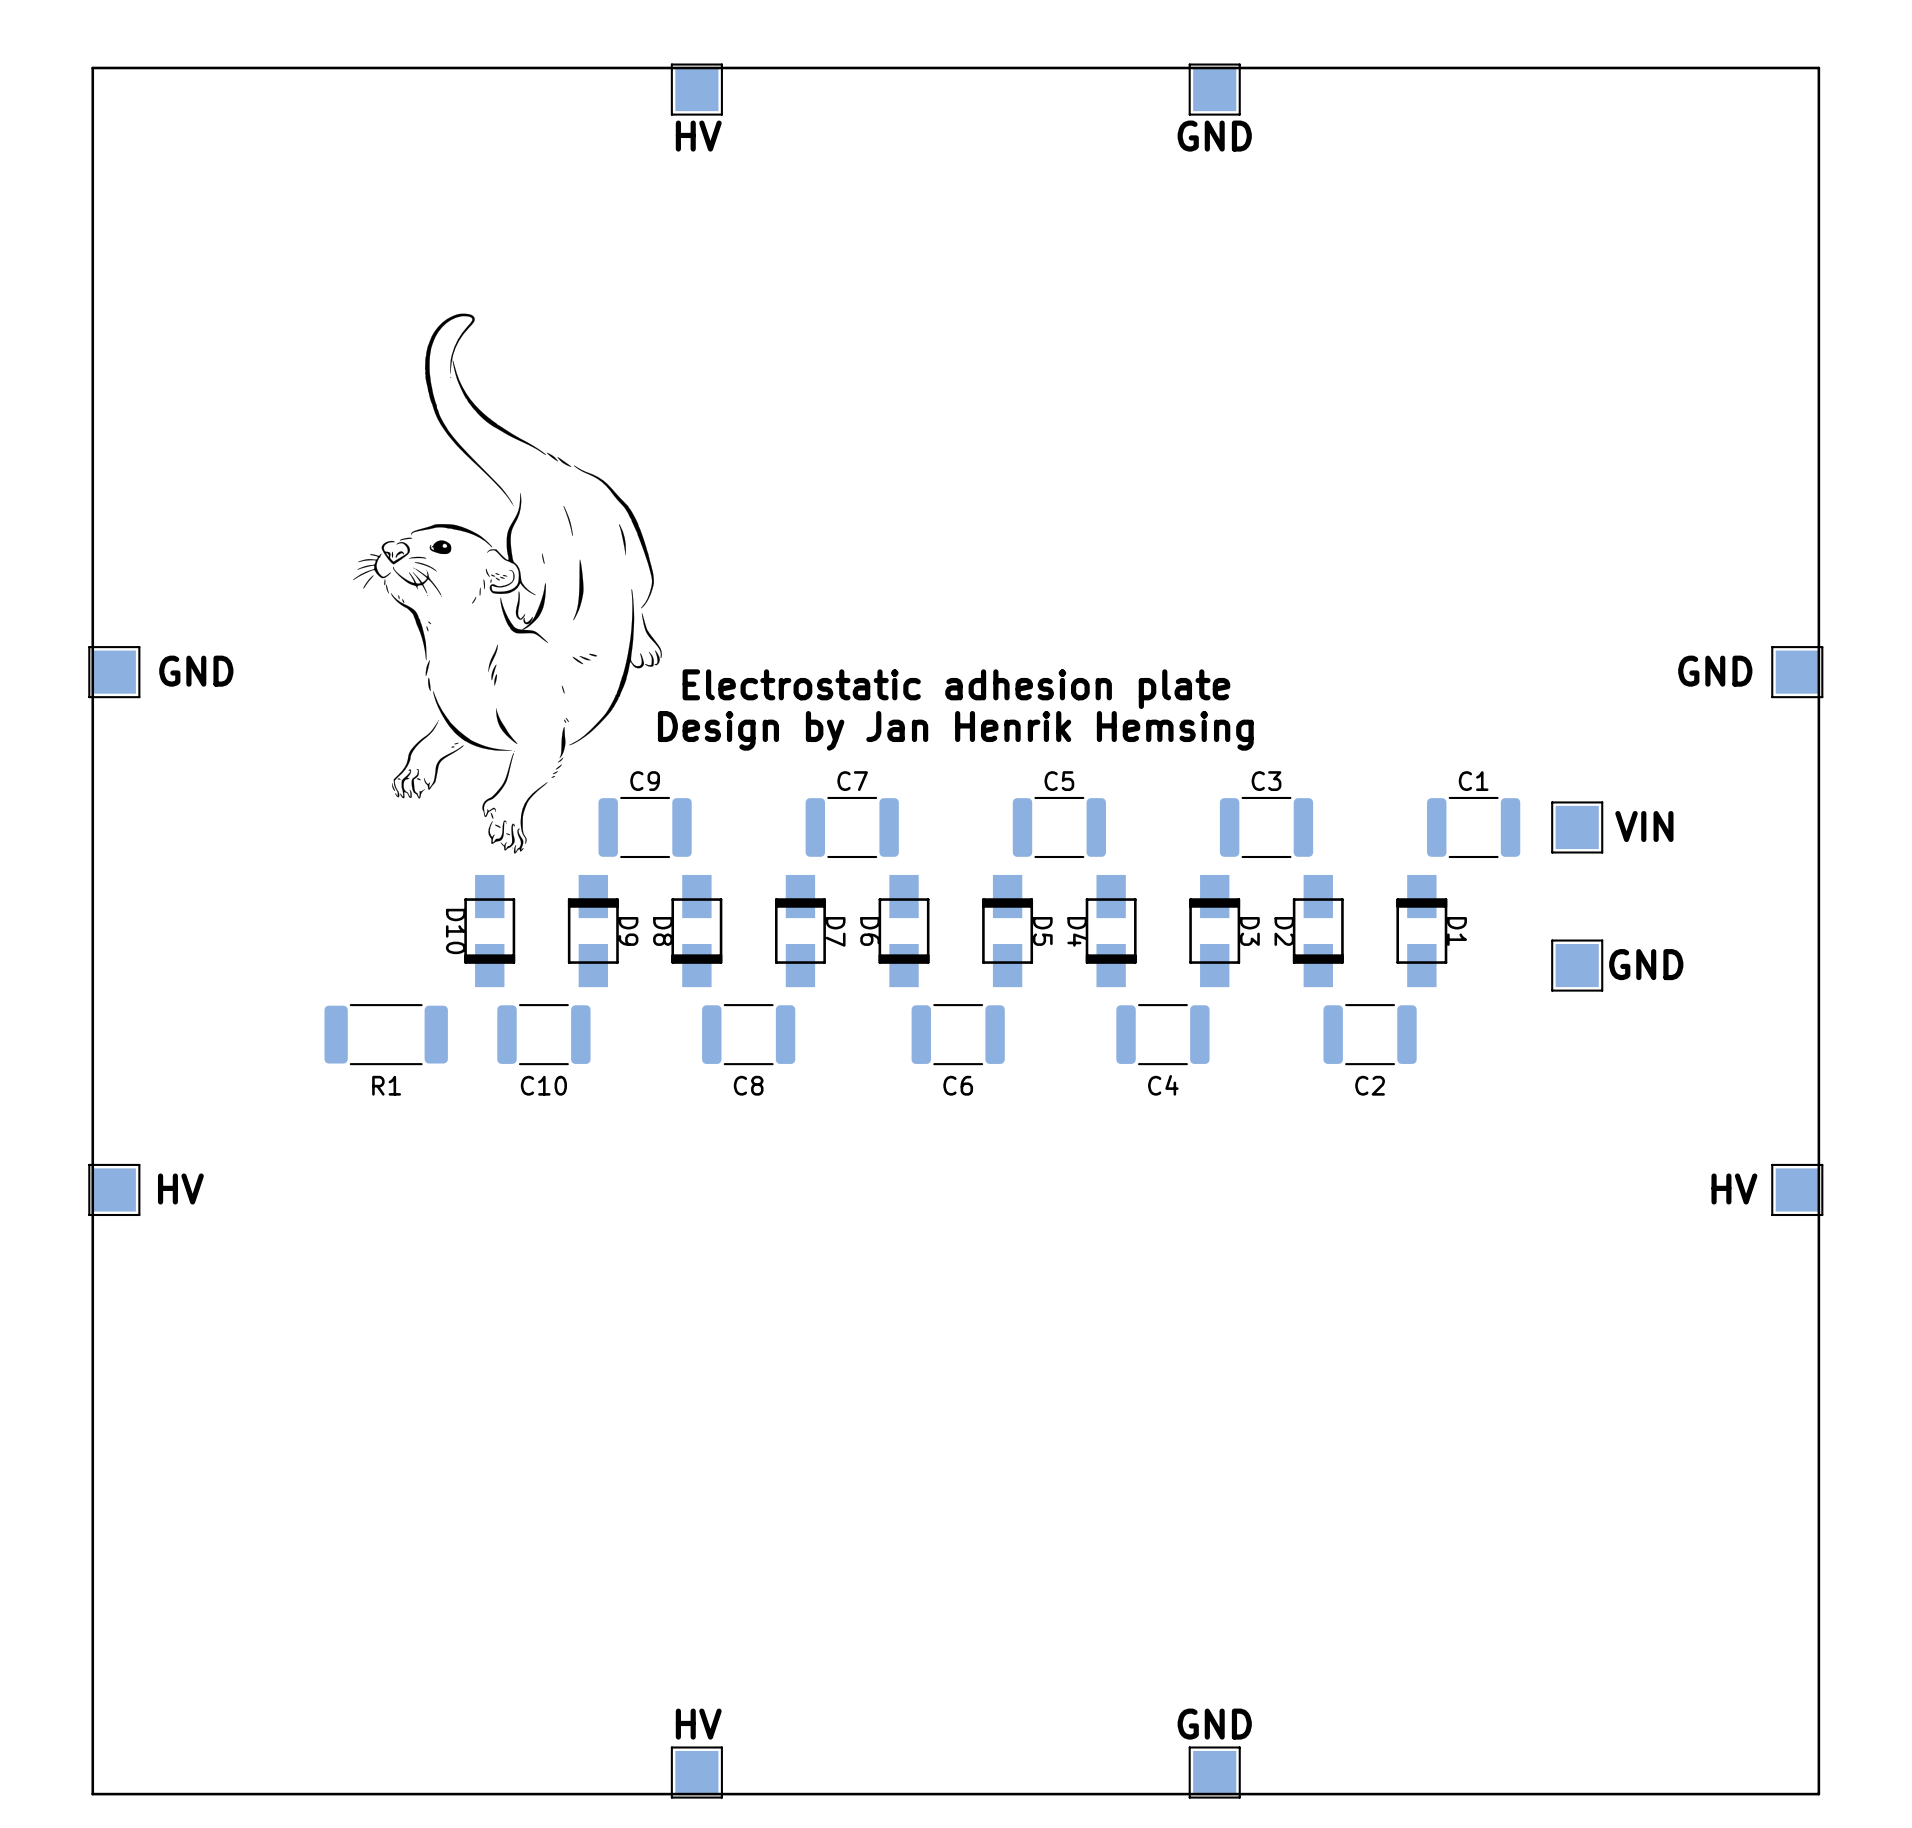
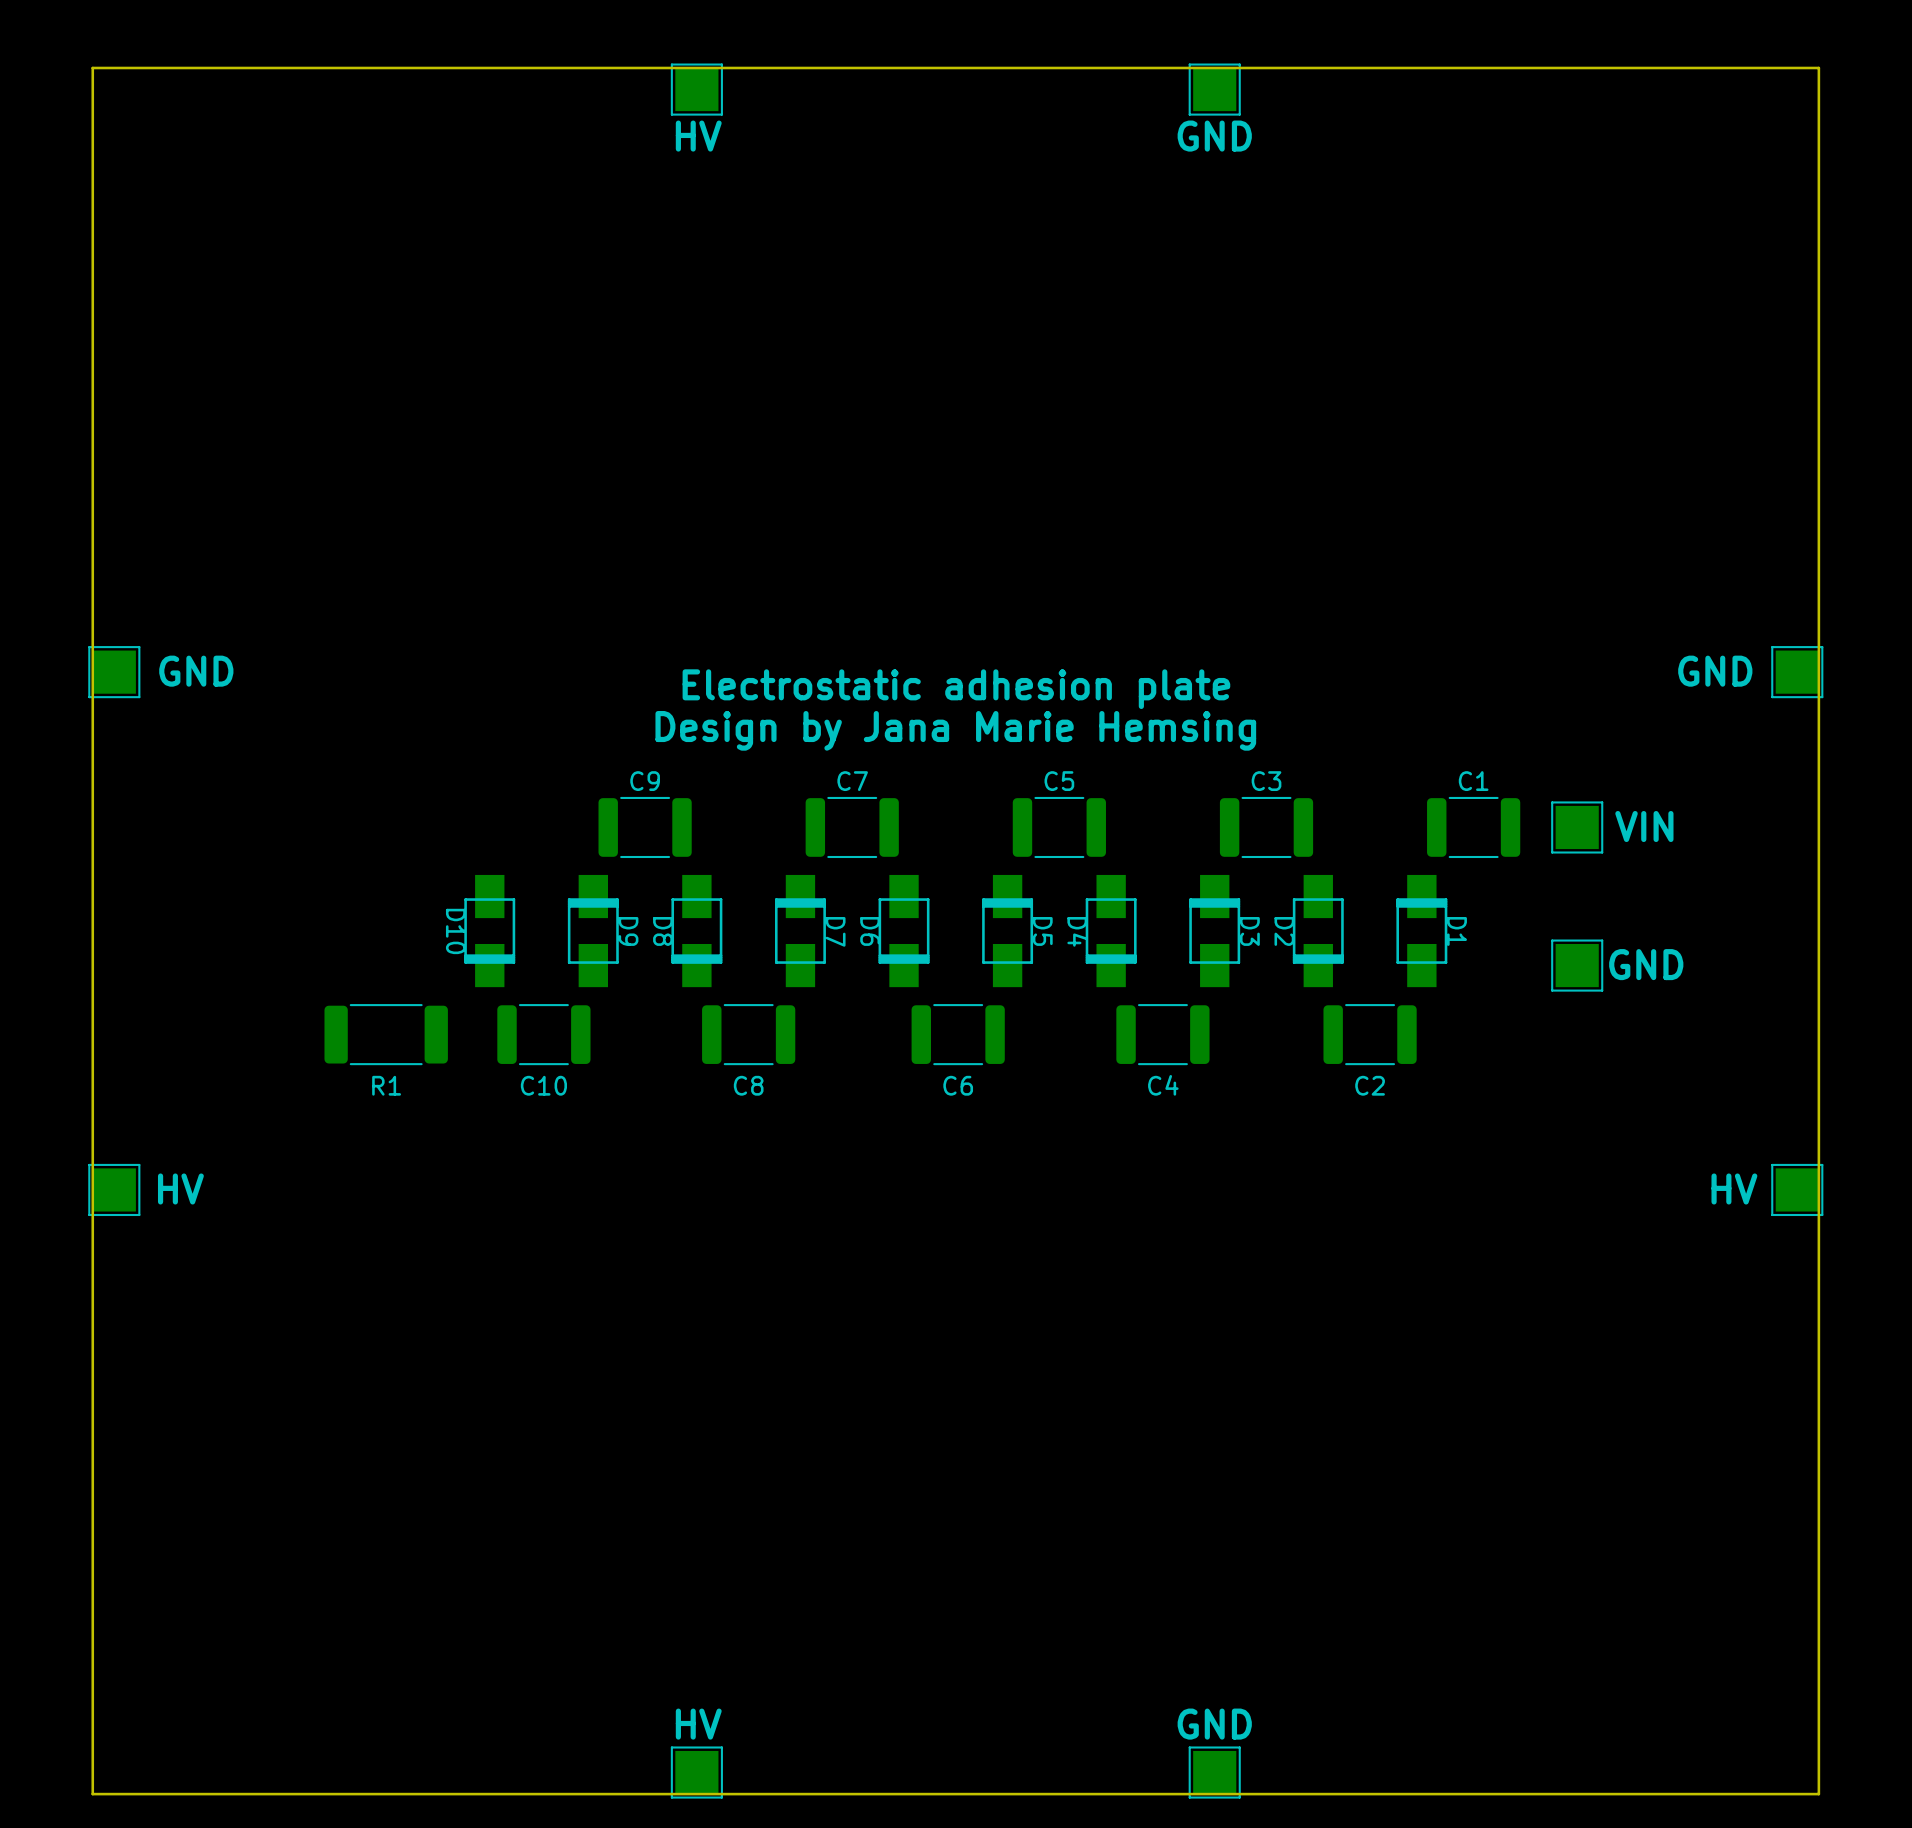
drawing: [352, 313, 662, 854] -> none
text: Design by Jan Henrik Hemsing (955, 730) -> Design by Jana Marie Hemsing (955, 730)

